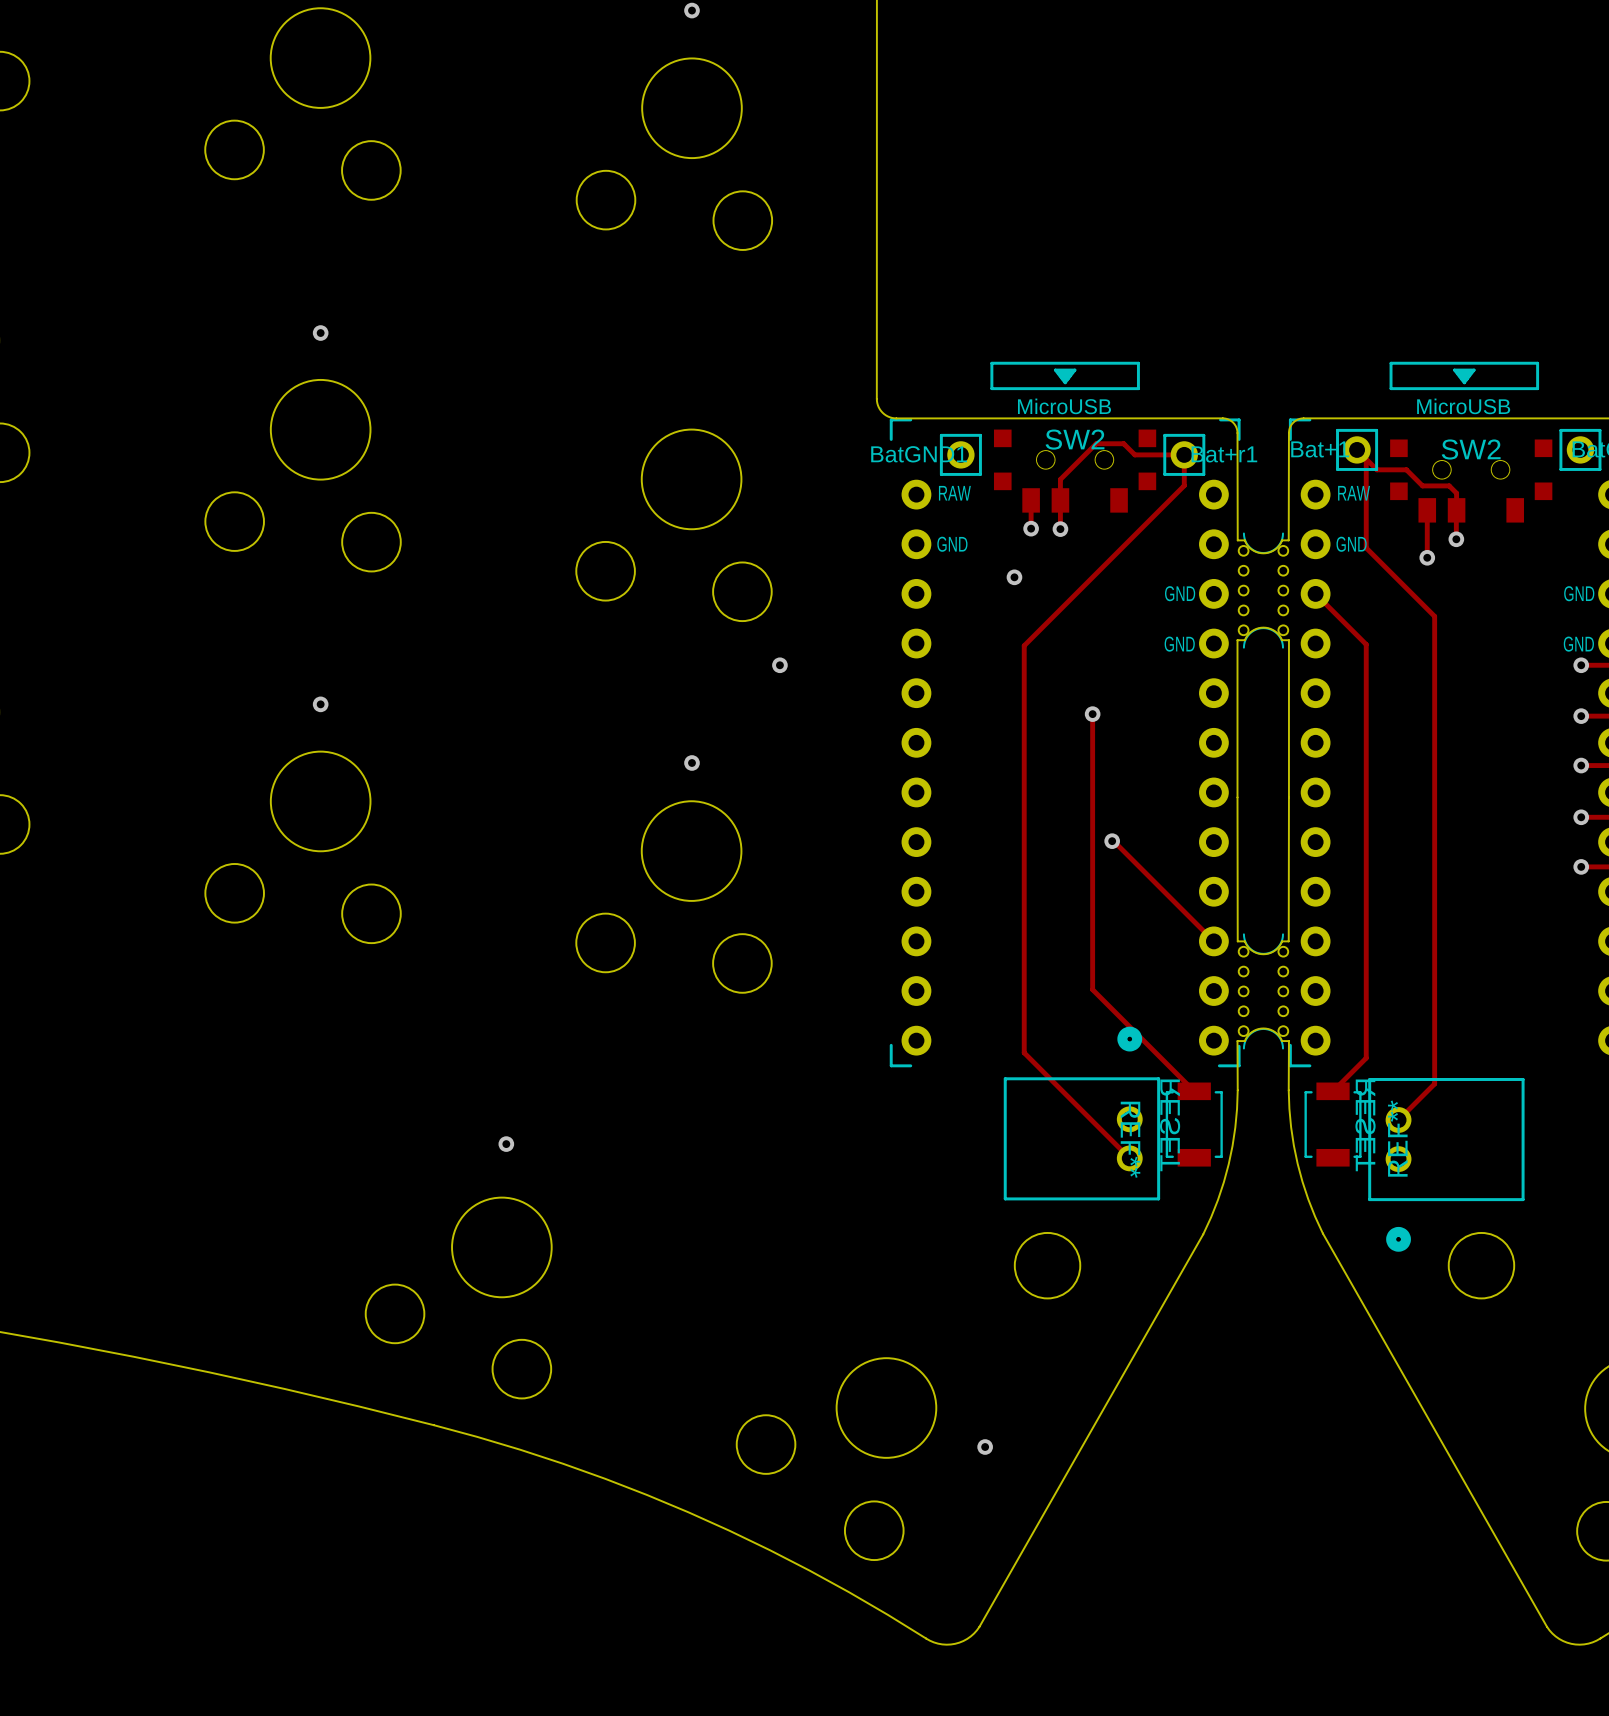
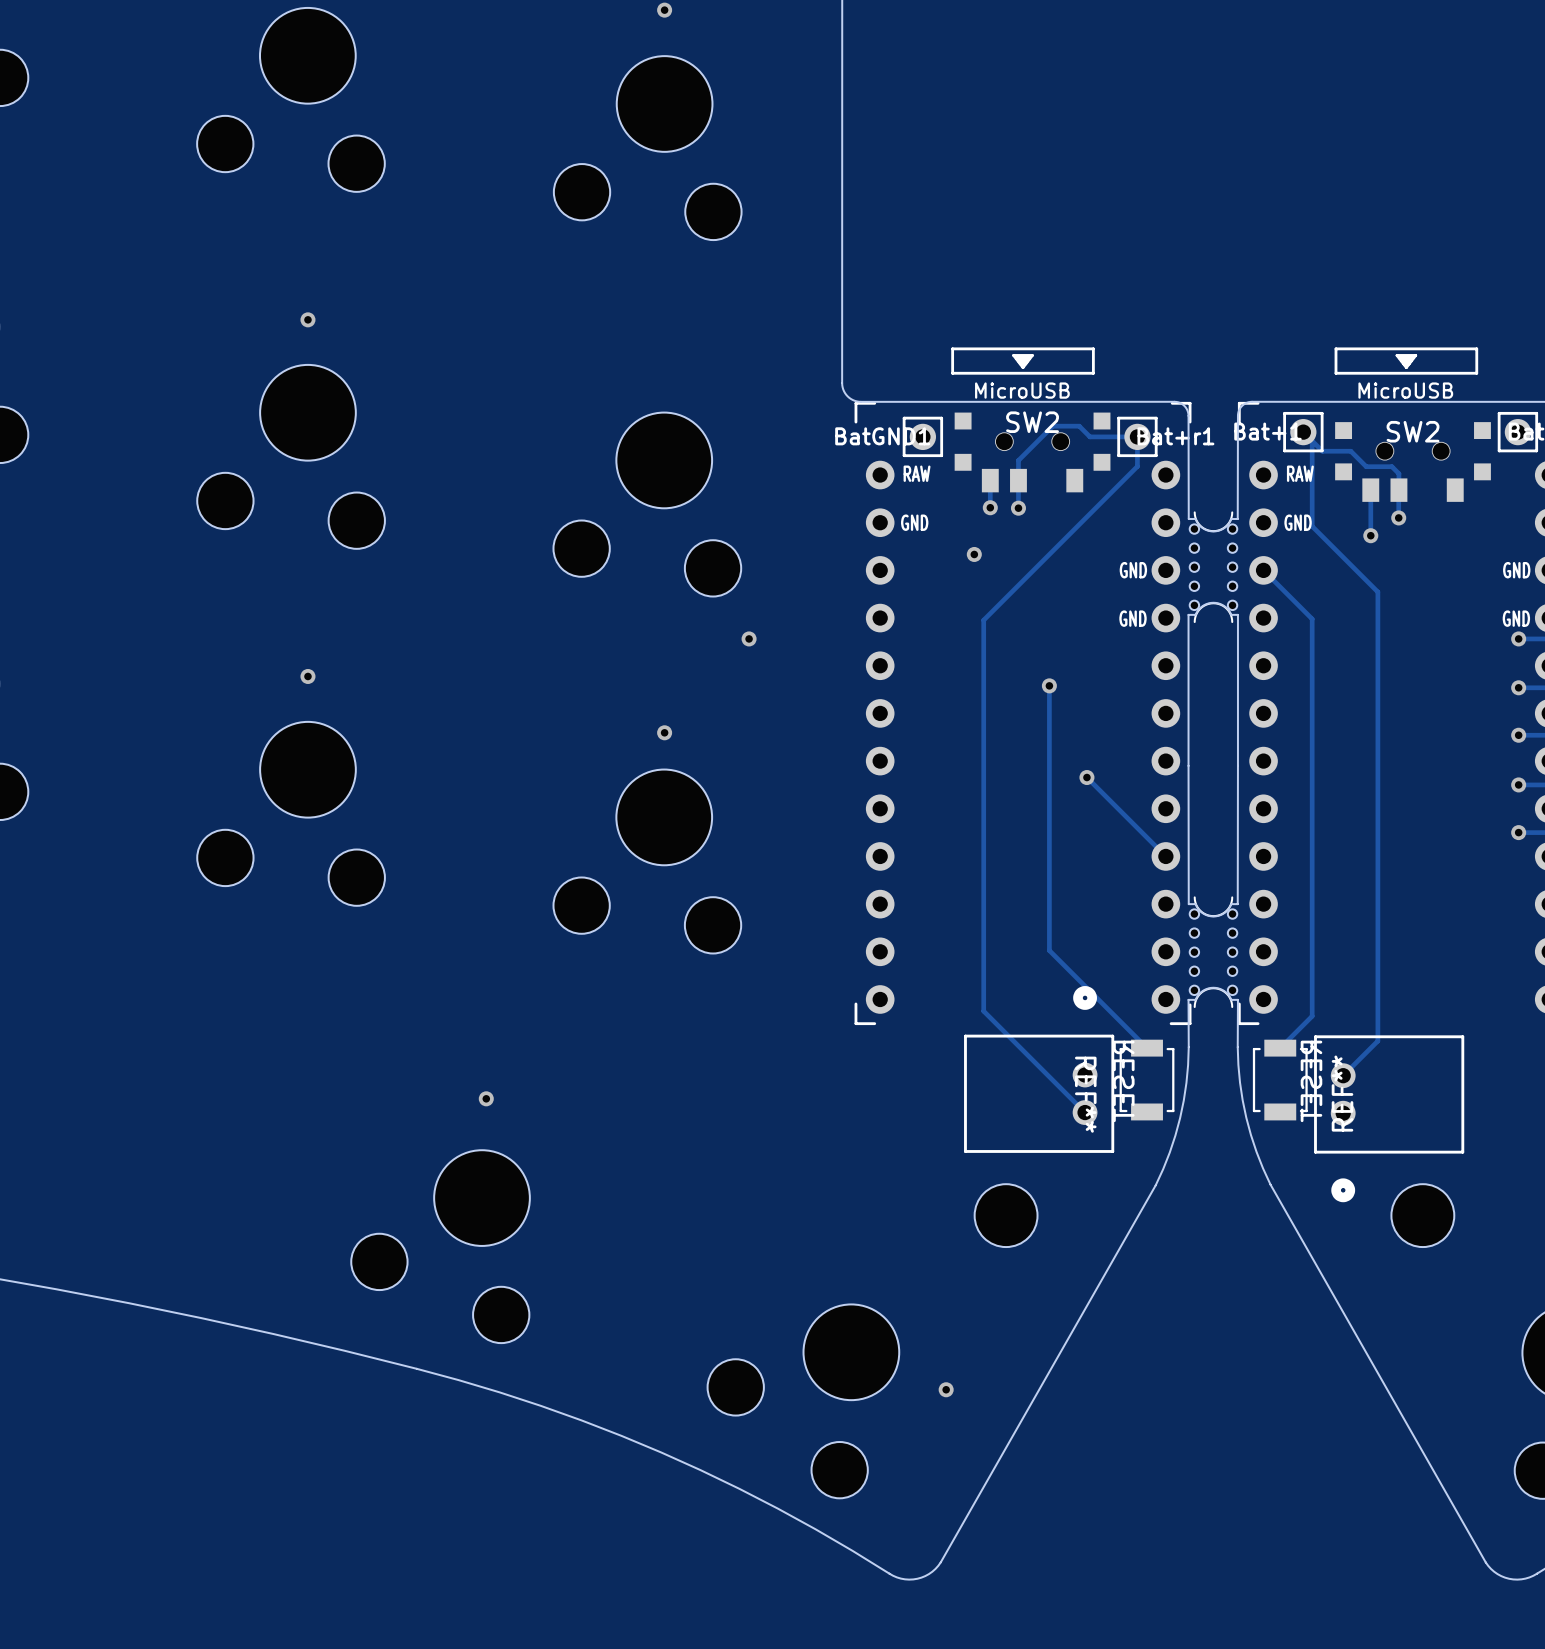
track: none -> (1086, 777) (1165, 856)
track: (1112, 841) (1213, 941) -> none
via position: (1112, 841) -> (1086, 777)

